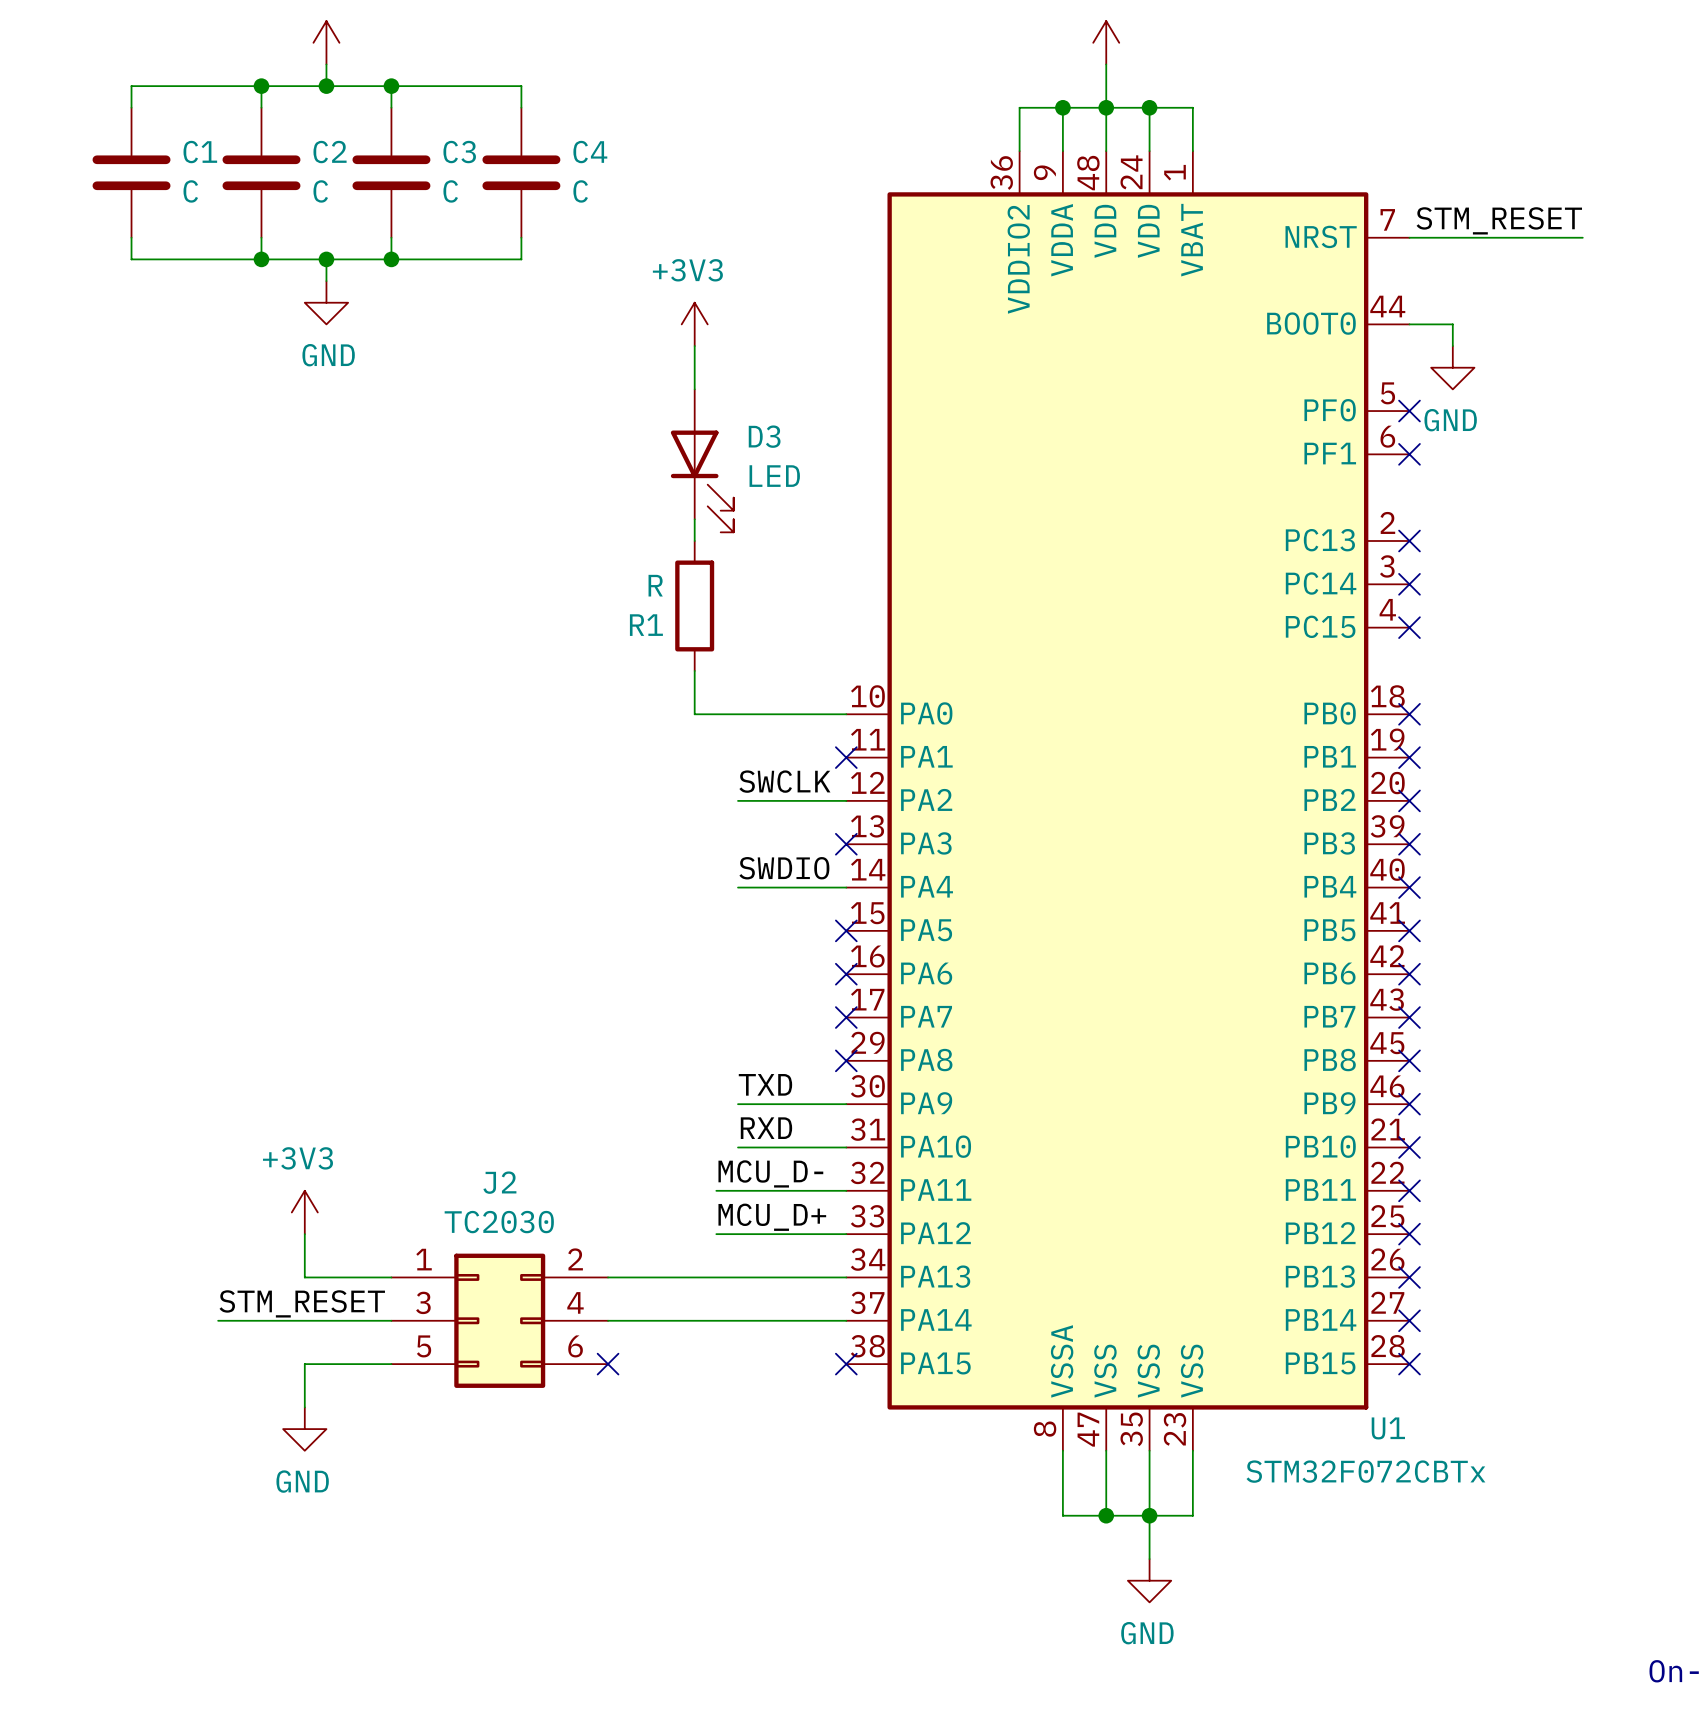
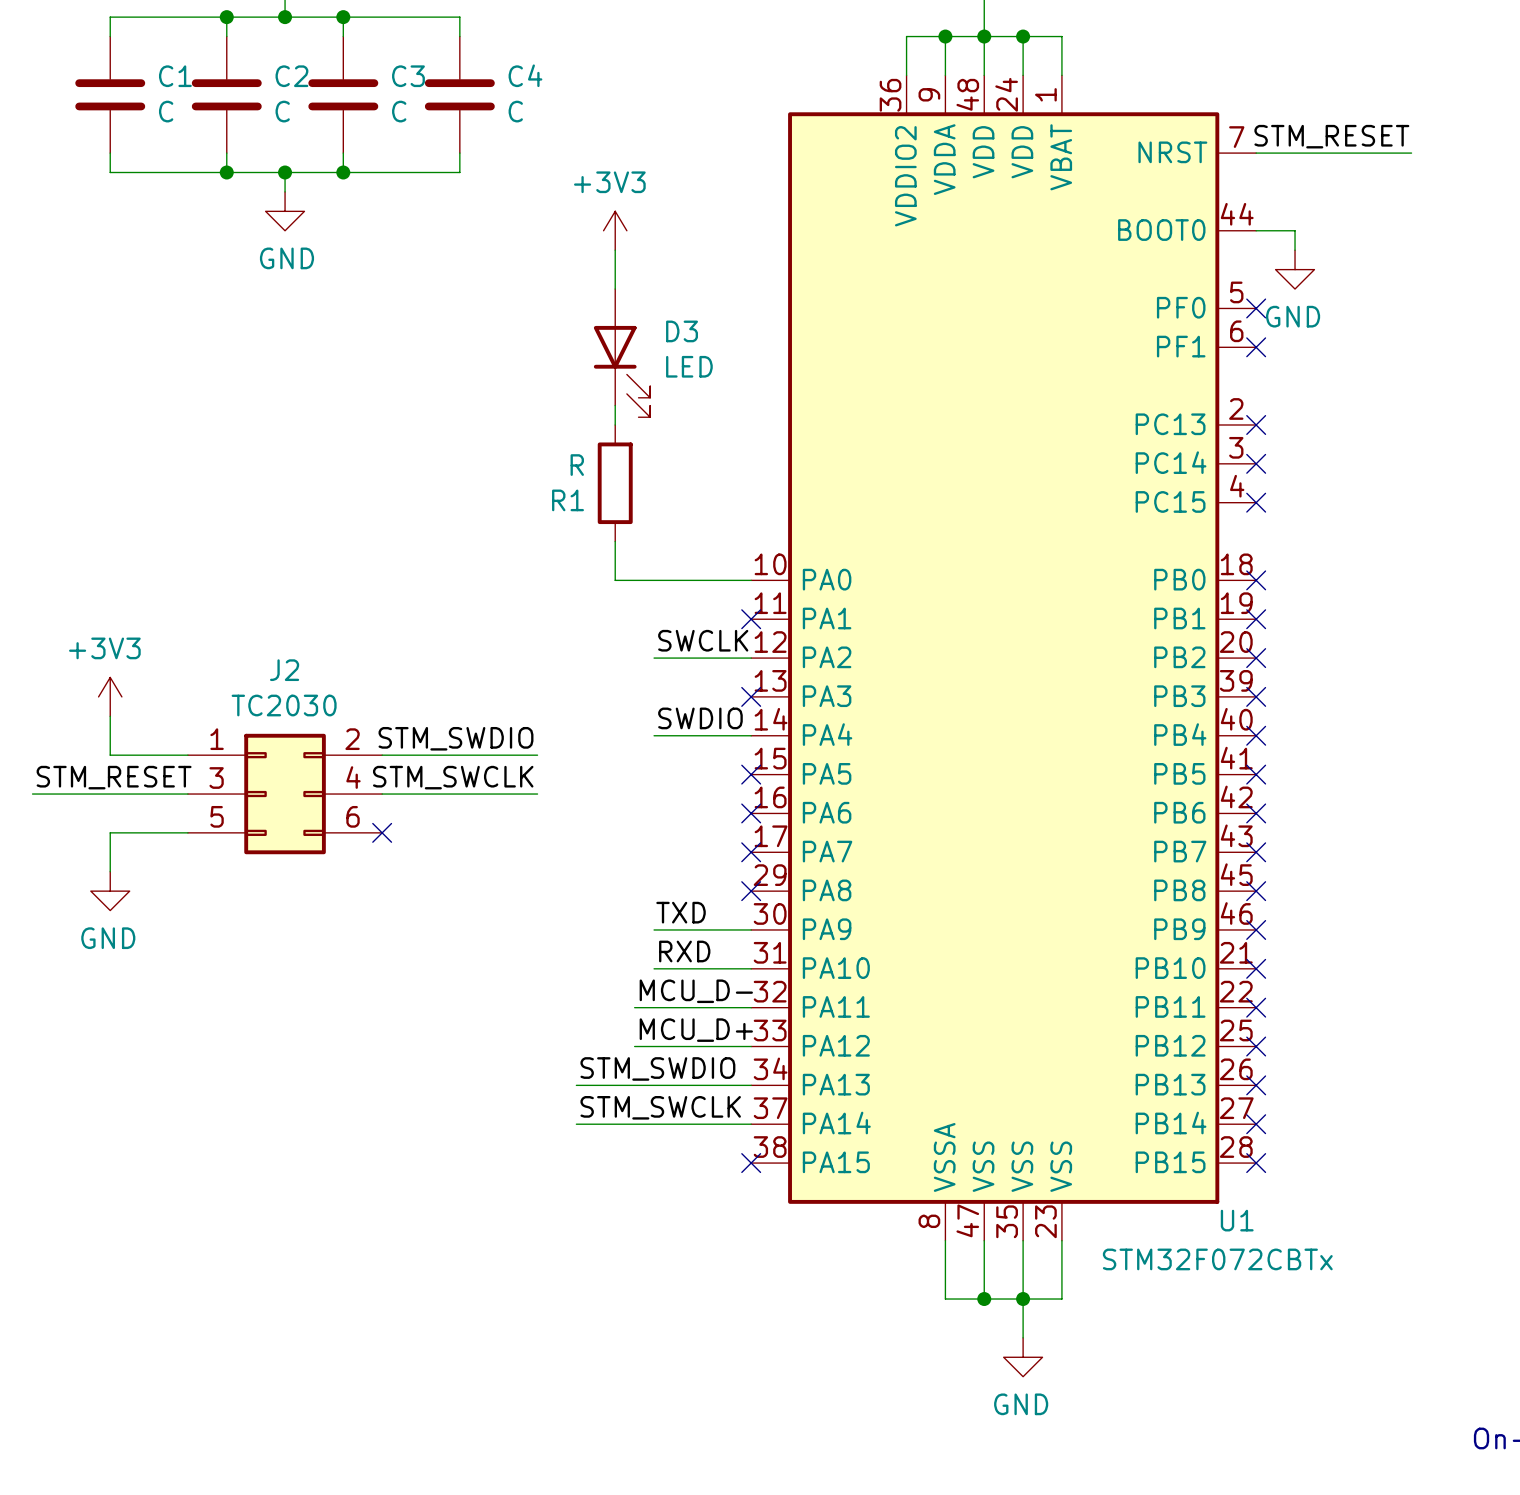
label: none -> STM_SWDIO (456, 738)
wire: none -> (382, 755) (537, 755)
label: none -> STM_SWCLK (453, 777)
wire: none -> (382, 794) (537, 794)
no-connect mark: none -> (382, 832)
power symbol position: +3V3 (304, 1212) -> +3V3 (110, 696)
wire: (304, 1234) (304, 1277) (391, 1277) -> (110, 716) (110, 755) (187, 755)
label: none -> STM_SWDIO (657, 1068)
wire: (608, 1277) (651, 1277) -> none
label position: STM_RESET (302, 1303) -> STM_RESET (114, 777)
label: none -> STM_SWCLK (660, 1107)
wire: (218, 1320) (391, 1320) -> (32, 794) (187, 794)
J2 position: (499, 1320) -> (285, 794)
wire: (608, 1320) (651, 1320) -> none
wire: (391, 1364) (304, 1364) (304, 1407) -> (187, 832) (110, 832) (110, 871)
no-connect mark: (608, 1364) -> none
power symbol position: GND (304, 1429) -> GND (110, 891)

